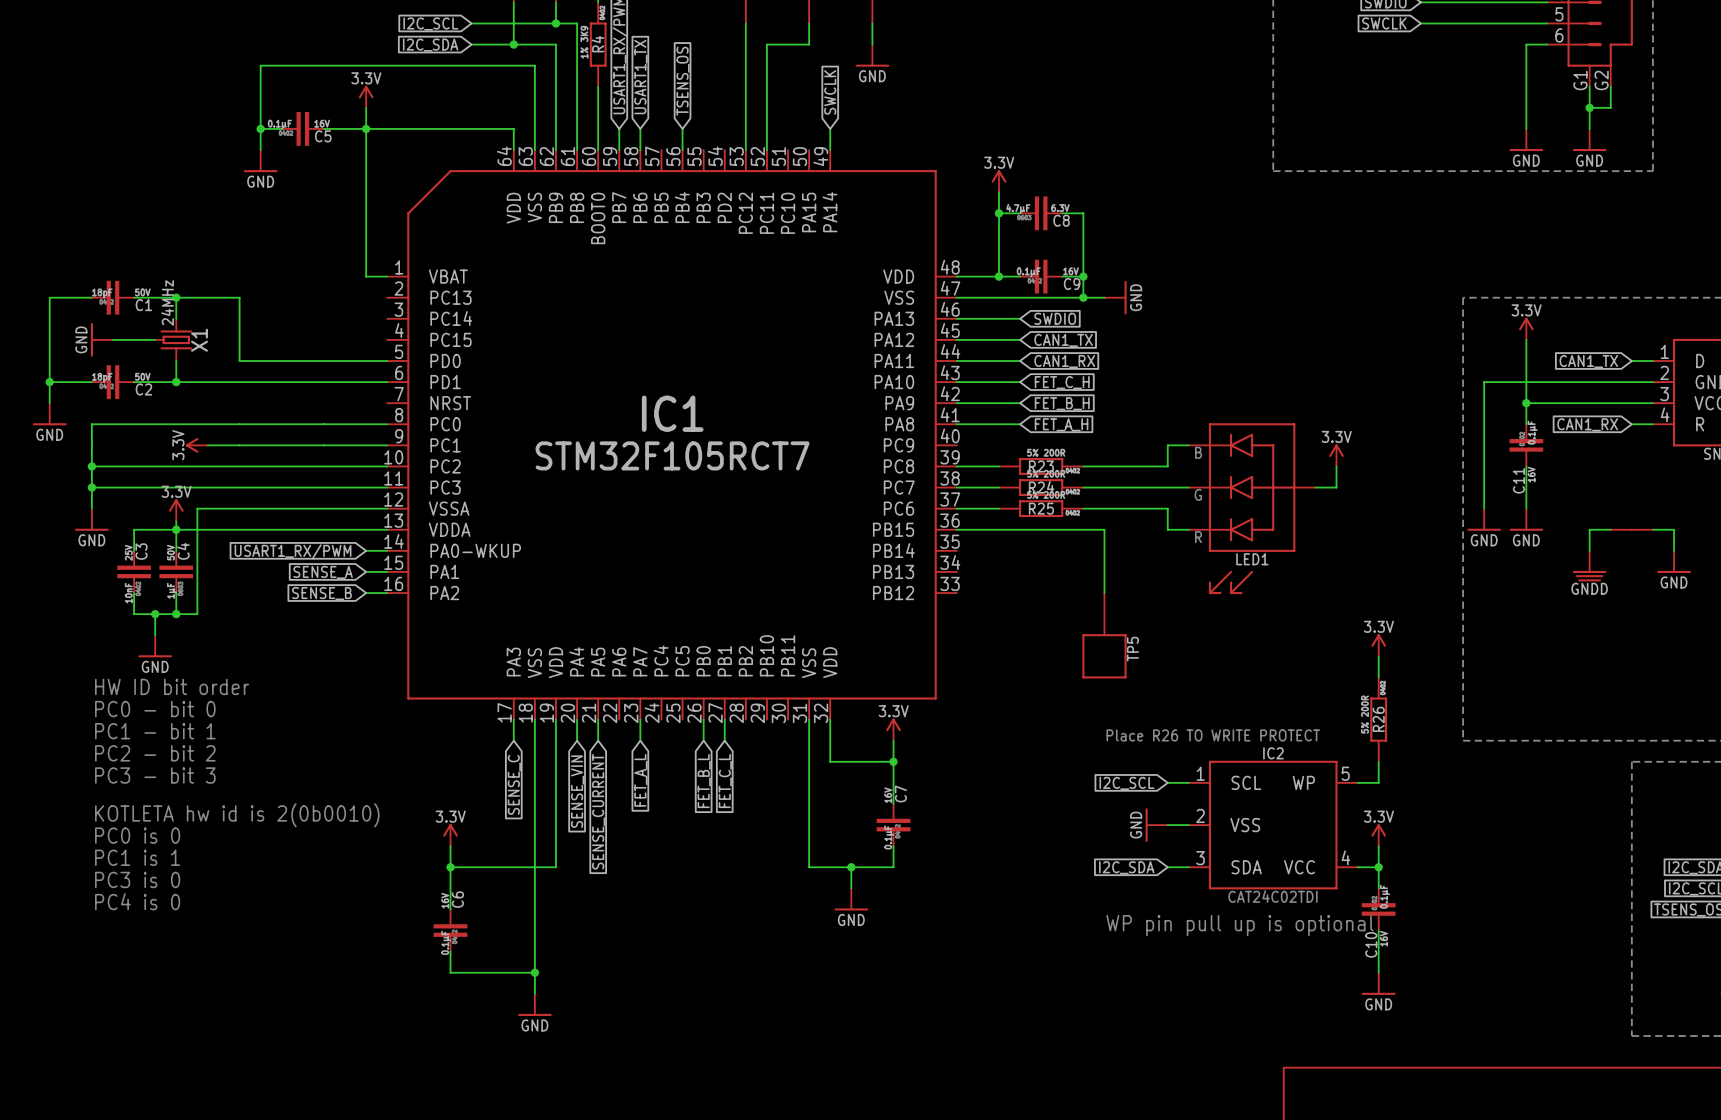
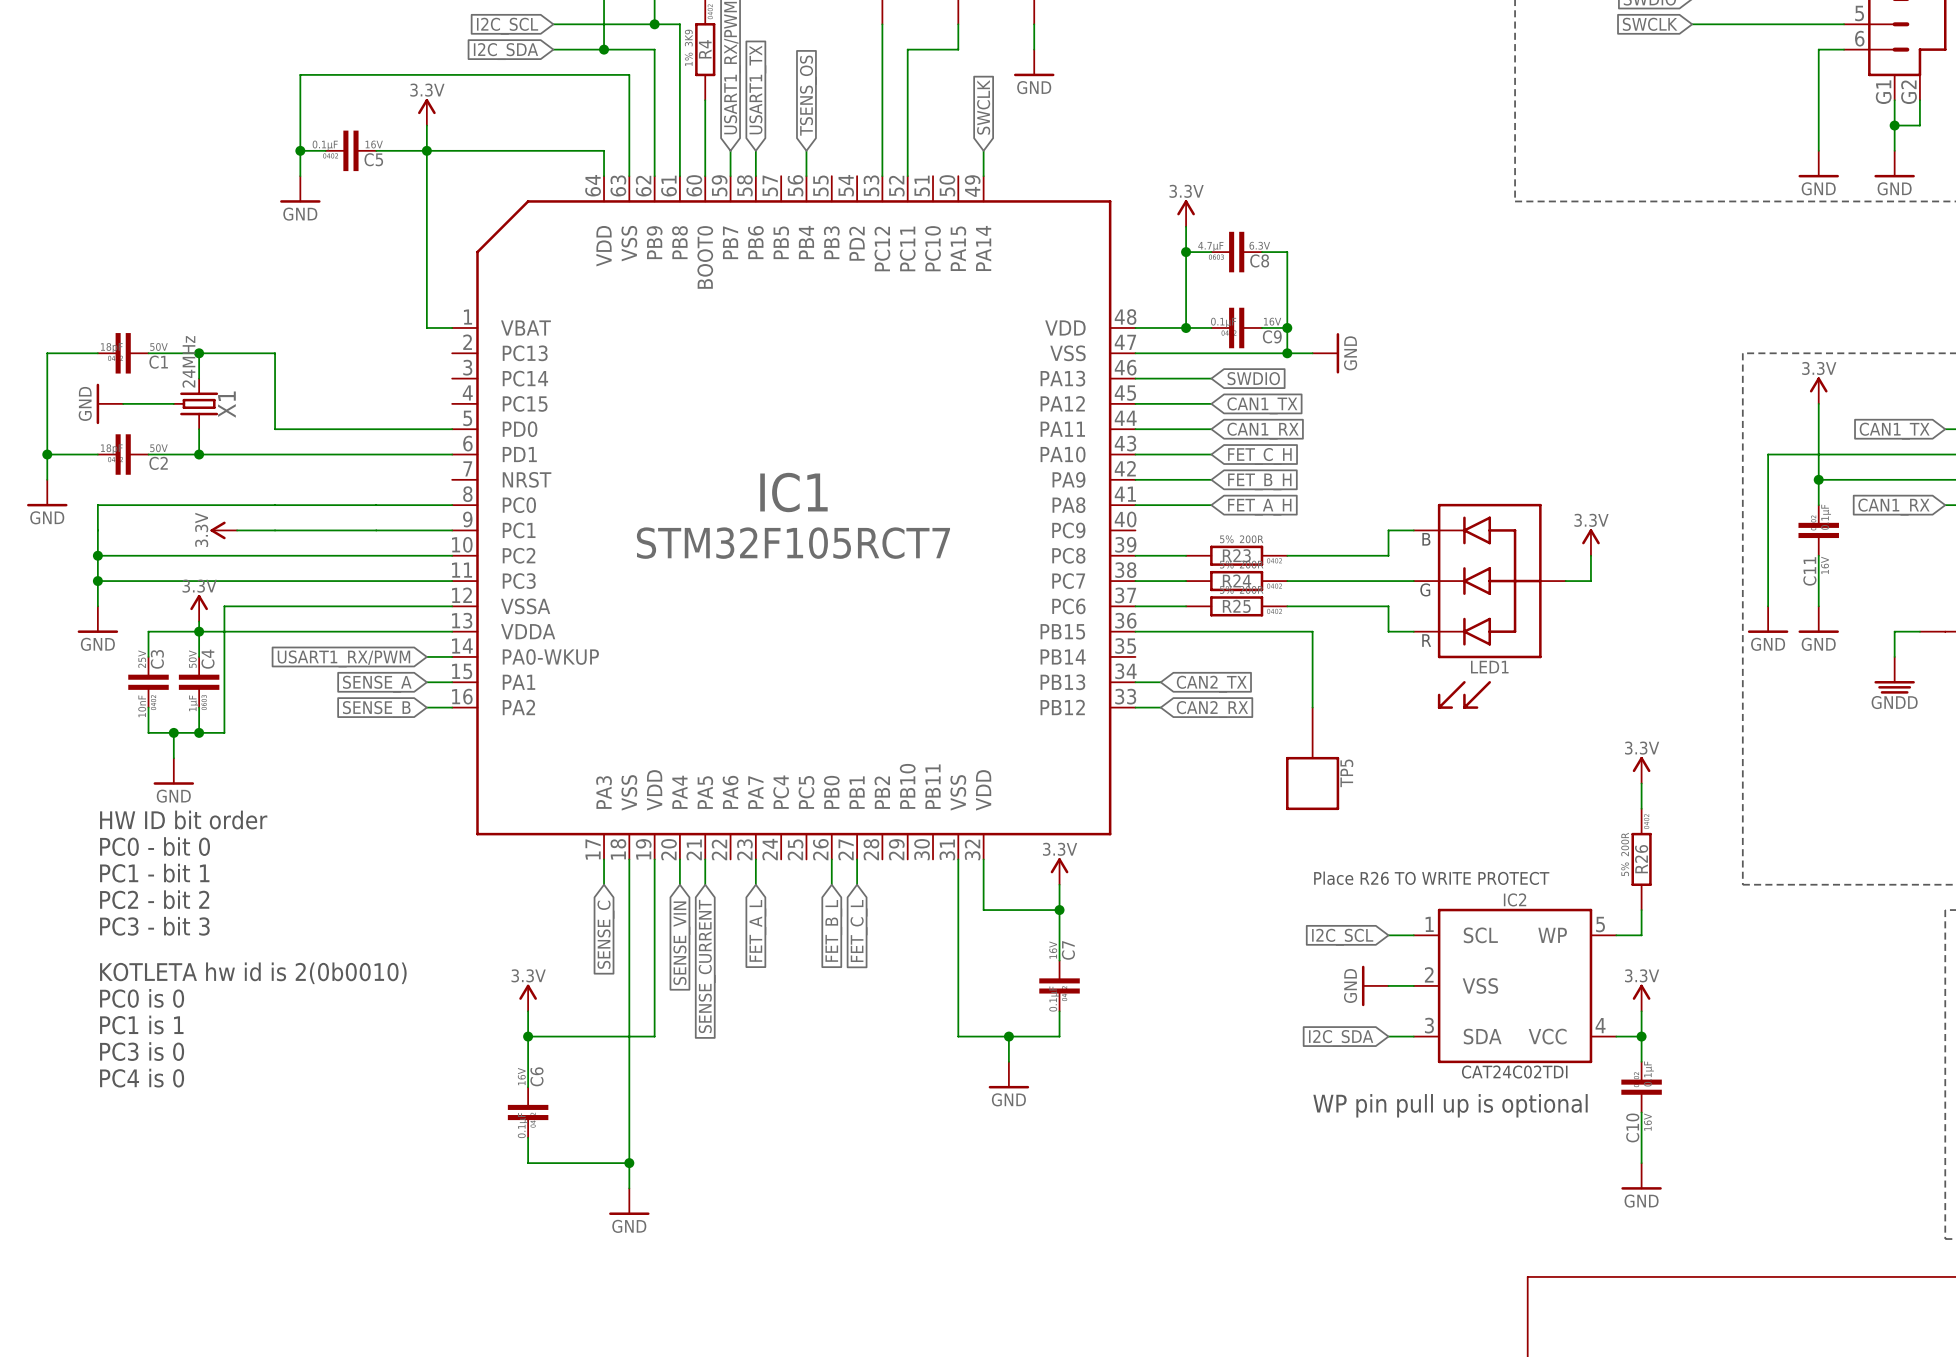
wire: none -> (1135, 682) (1160, 682)
global label: none -> CAN2_TX (1211, 684)
wire: none -> (1135, 707) (1160, 707)
global label: none -> CAN2_RX (1212, 709)

